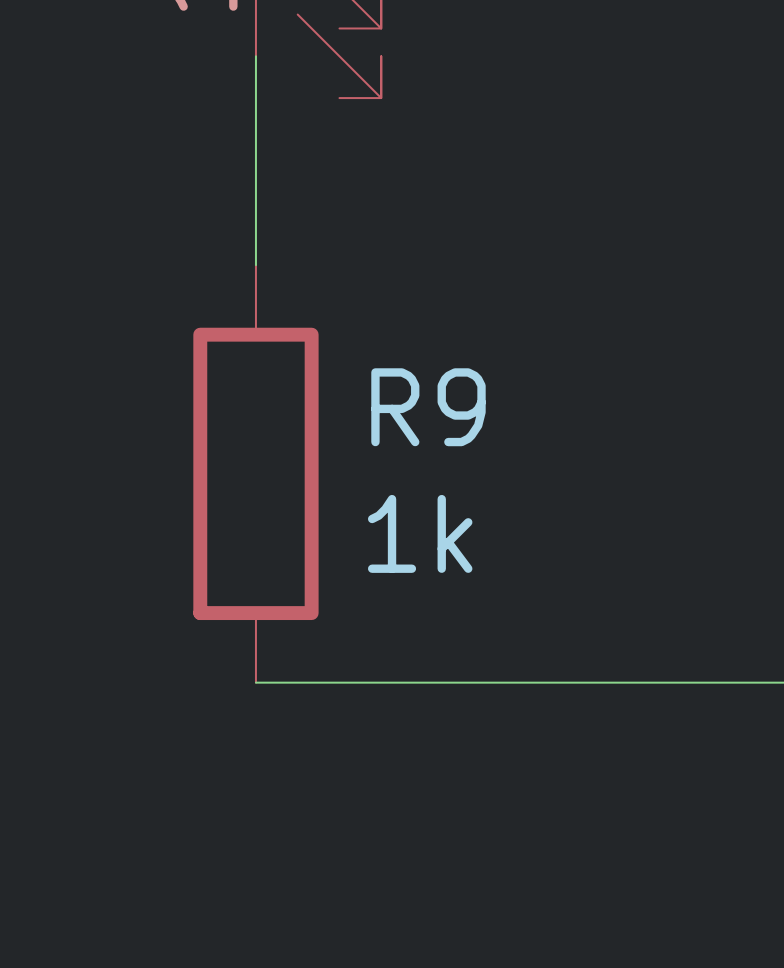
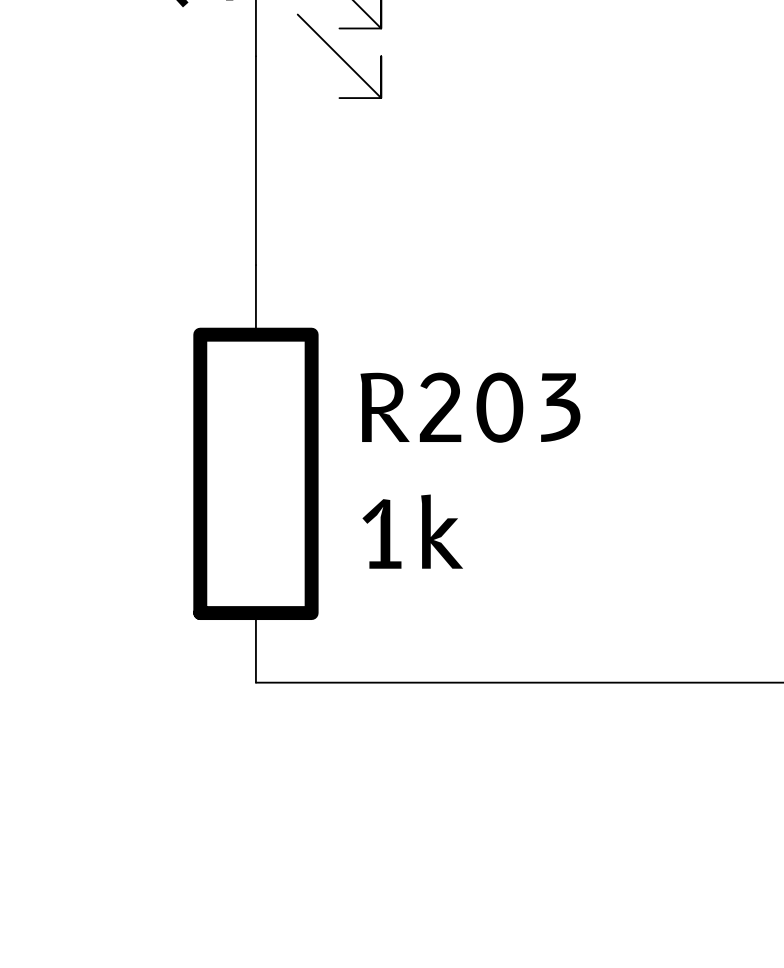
R9 name: R9 (428, 407) -> R203 (470, 407)

